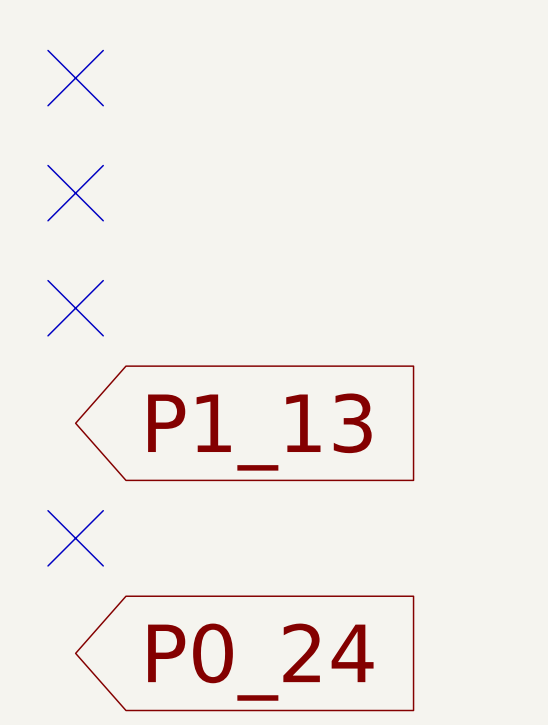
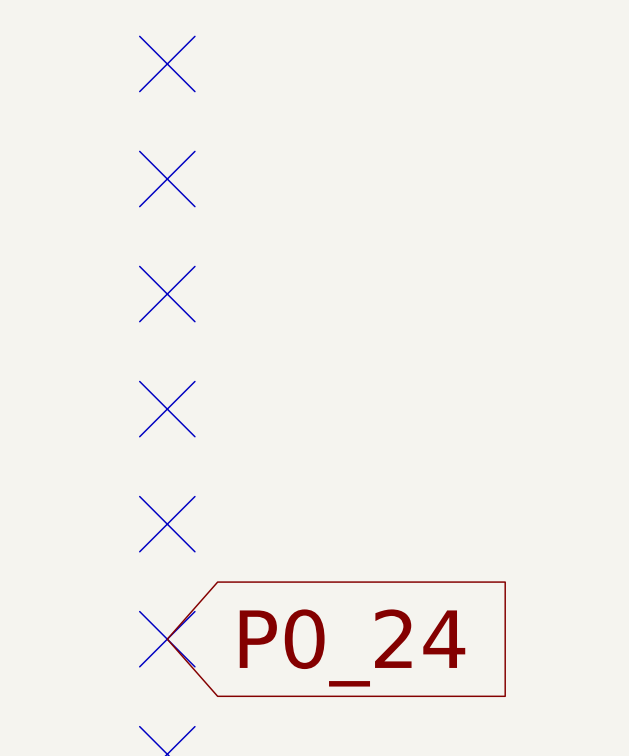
no-connect mark: none -> (167, 409)
global label: P1_13 (259, 432) -> none
no-connect mark: none -> (167, 639)

